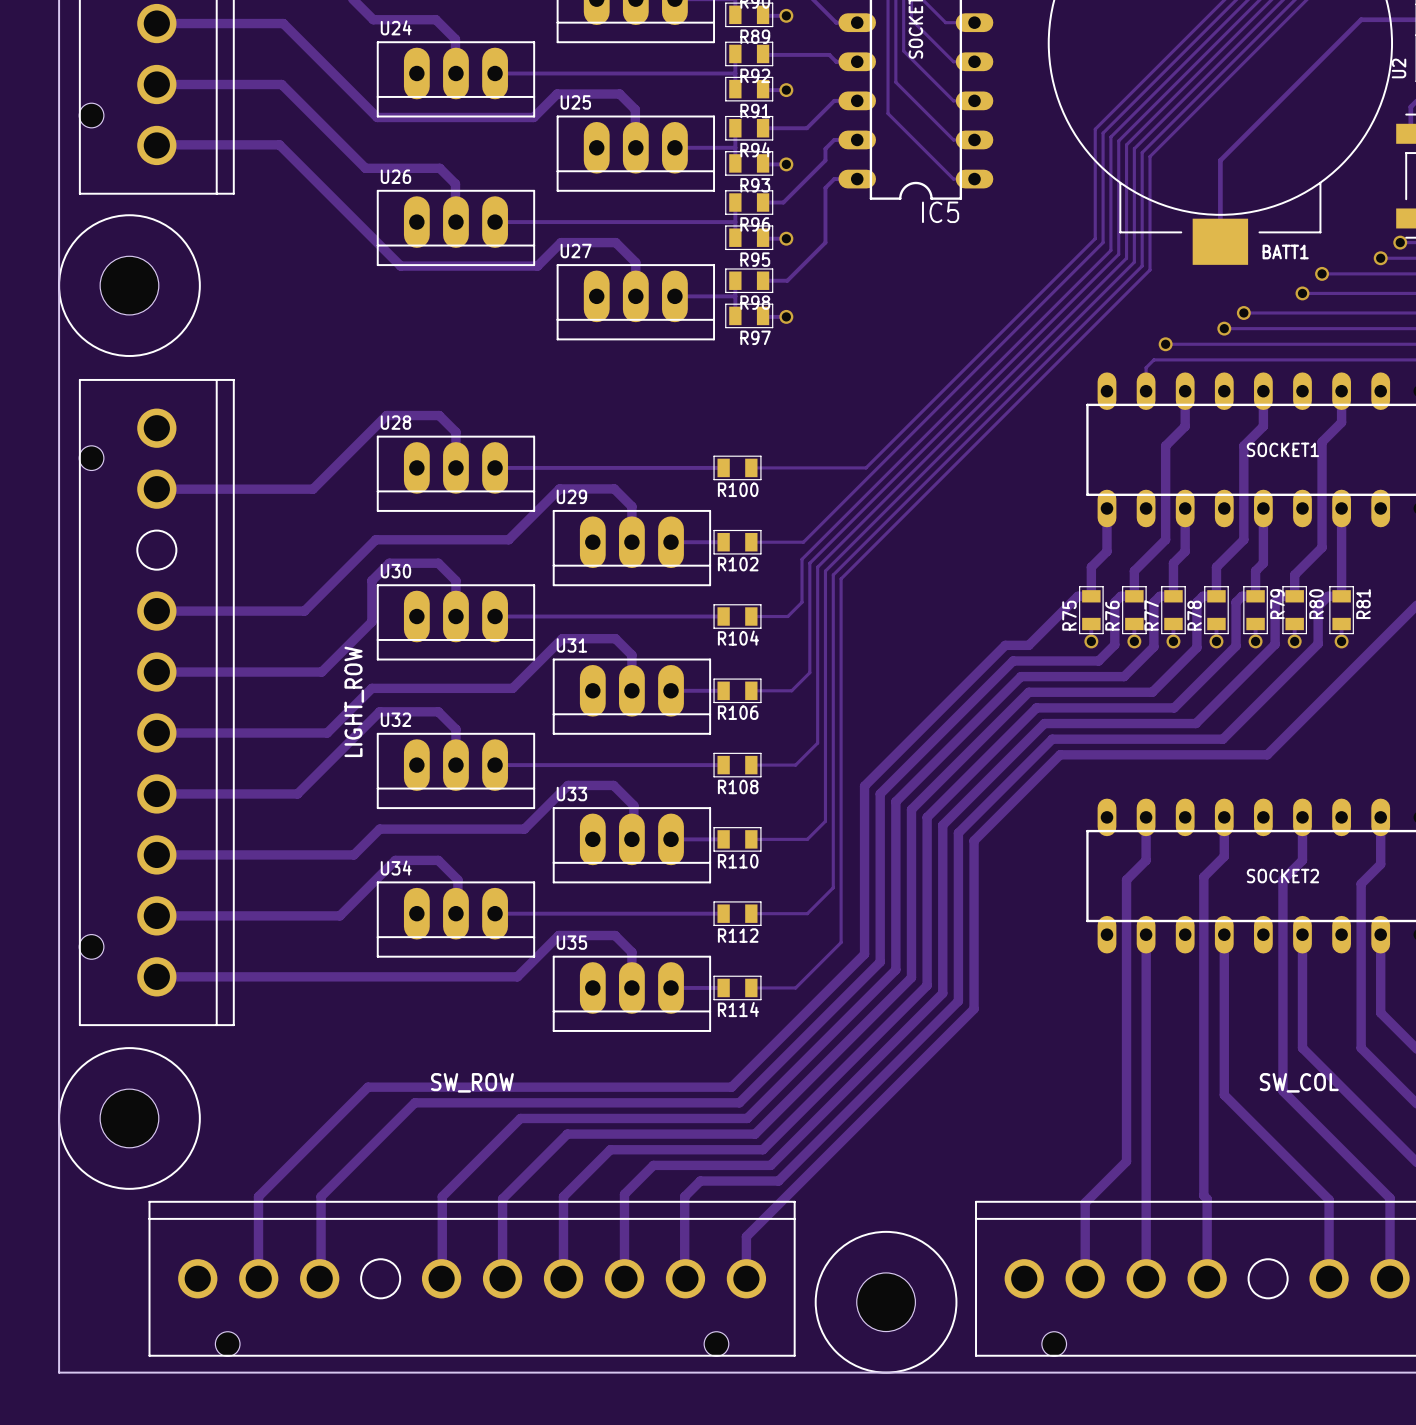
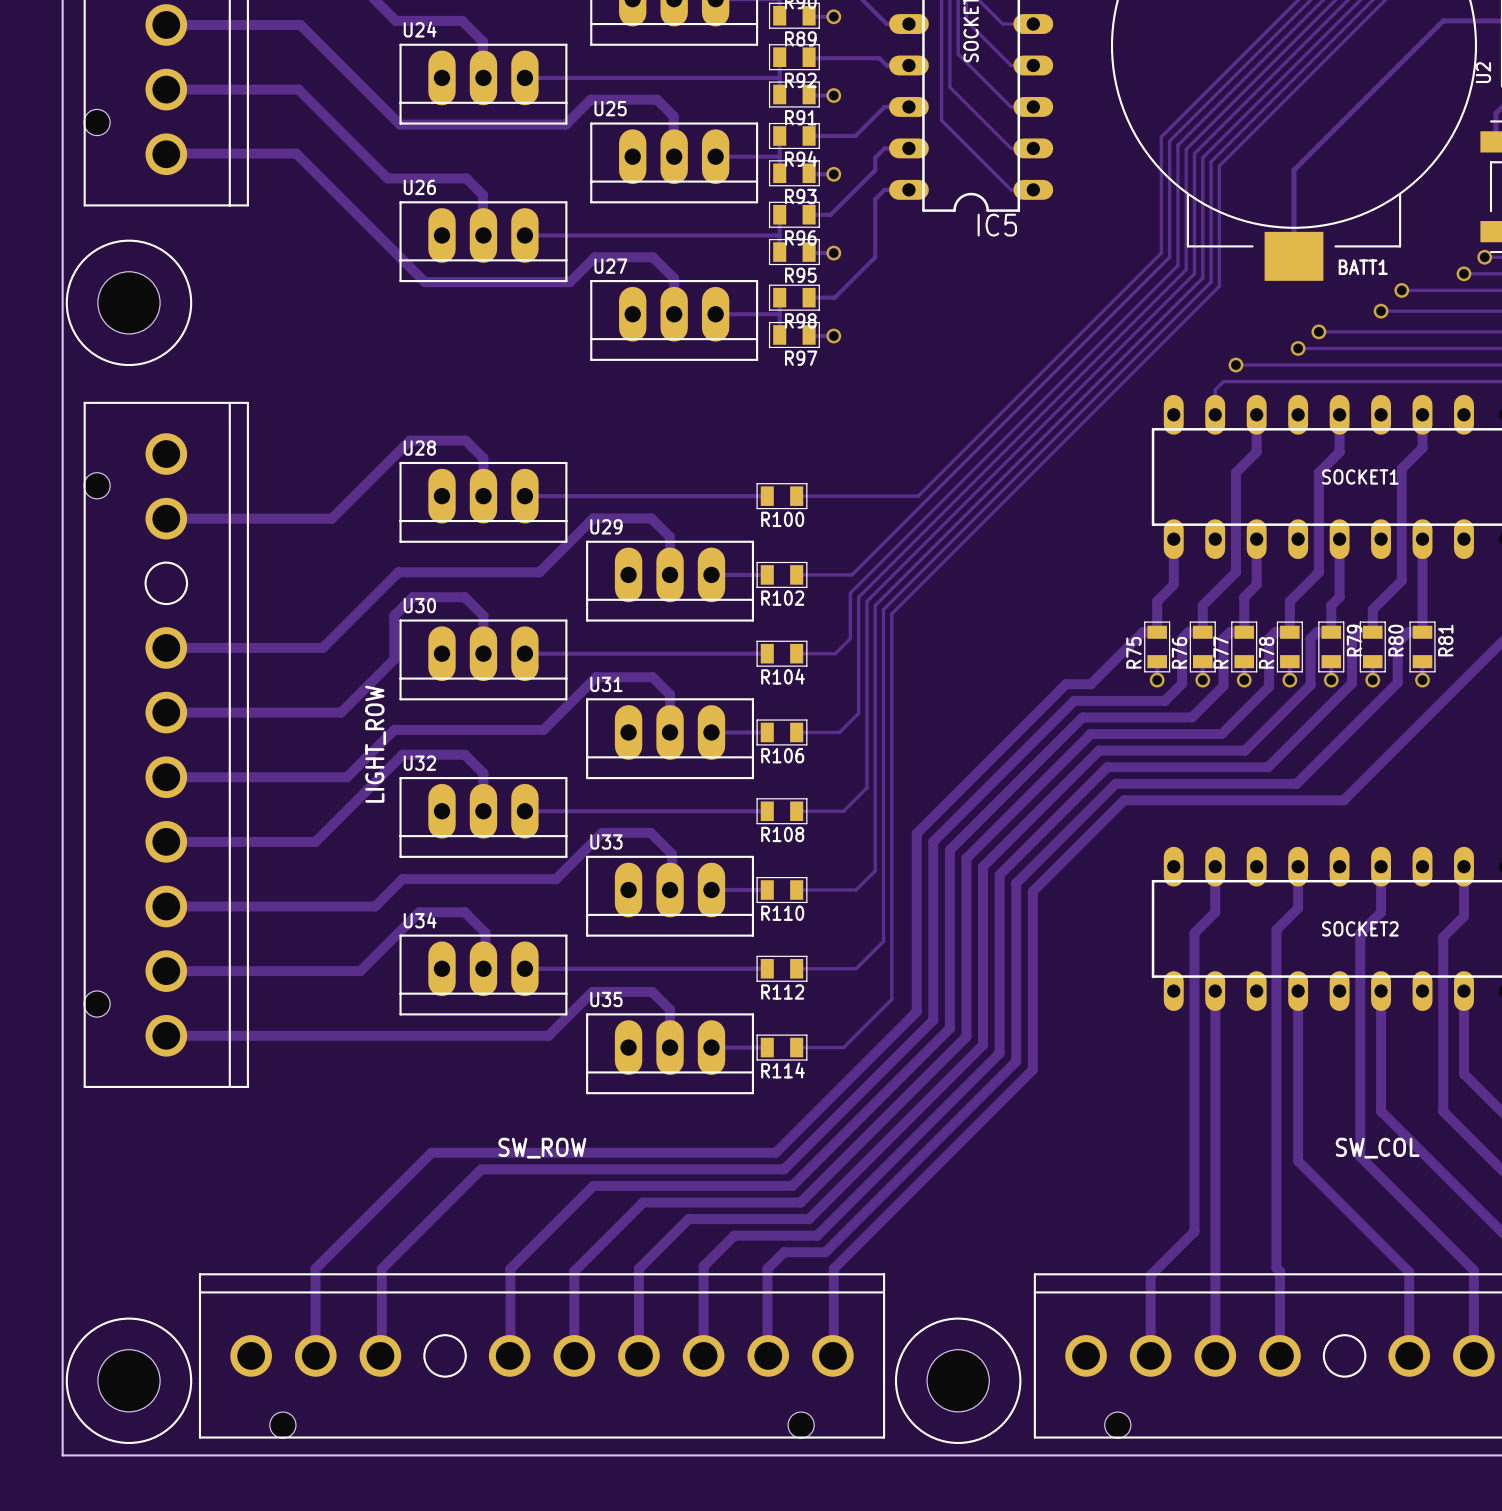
part footprint: [58, 214, 201, 357] -> [65, 239, 193, 367]
track: (407, 1087) (367, 1087) (258, 1196) (258, 1278) -> (431, 1152) (315, 1268) (315, 1355)
track: (454, 1102) (414, 1102) (321, 1196) (319, 1278) -> (481, 1169) (381, 1268) (380, 1355)
part: (129, 1118) -> none
track: (559, 1118) (520, 1118) (442, 1196) (441, 1278) -> (593, 1185) (510, 1268) (509, 1355)
track: (606, 1134) (567, 1134) (502, 1198) (502, 1278) -> (643, 1202) (574, 1271) (574, 1355)
track: (649, 1149) (610, 1149) (563, 1196) (563, 1278) -> (688, 1219) (638, 1268) (638, 1355)
track: (692, 1165) (653, 1165) (624, 1194) (624, 1278) -> (734, 1235) (703, 1266) (703, 1355)
track: (739, 1181) (700, 1181) (684, 1196) (685, 1278) -> (784, 1252) (767, 1268) (768, 1355)
track: (786, 1196) (746, 1236) (747, 1277) -> (833, 1268) (832, 1355)
SW_ROW position: (472, 1278) -> (542, 1355)
part: none -> (128, 1380)
part: (886, 1302) -> none
part: none -> (958, 1380)

